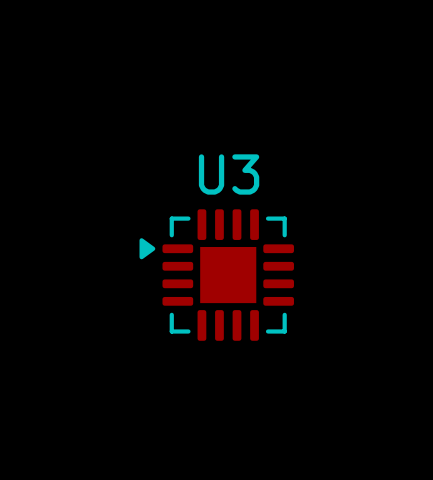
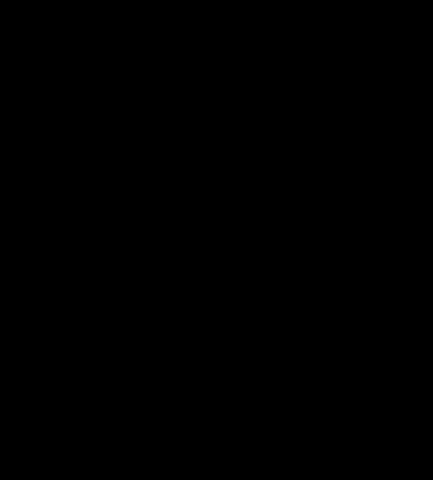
U3: (216, 275) -> none

